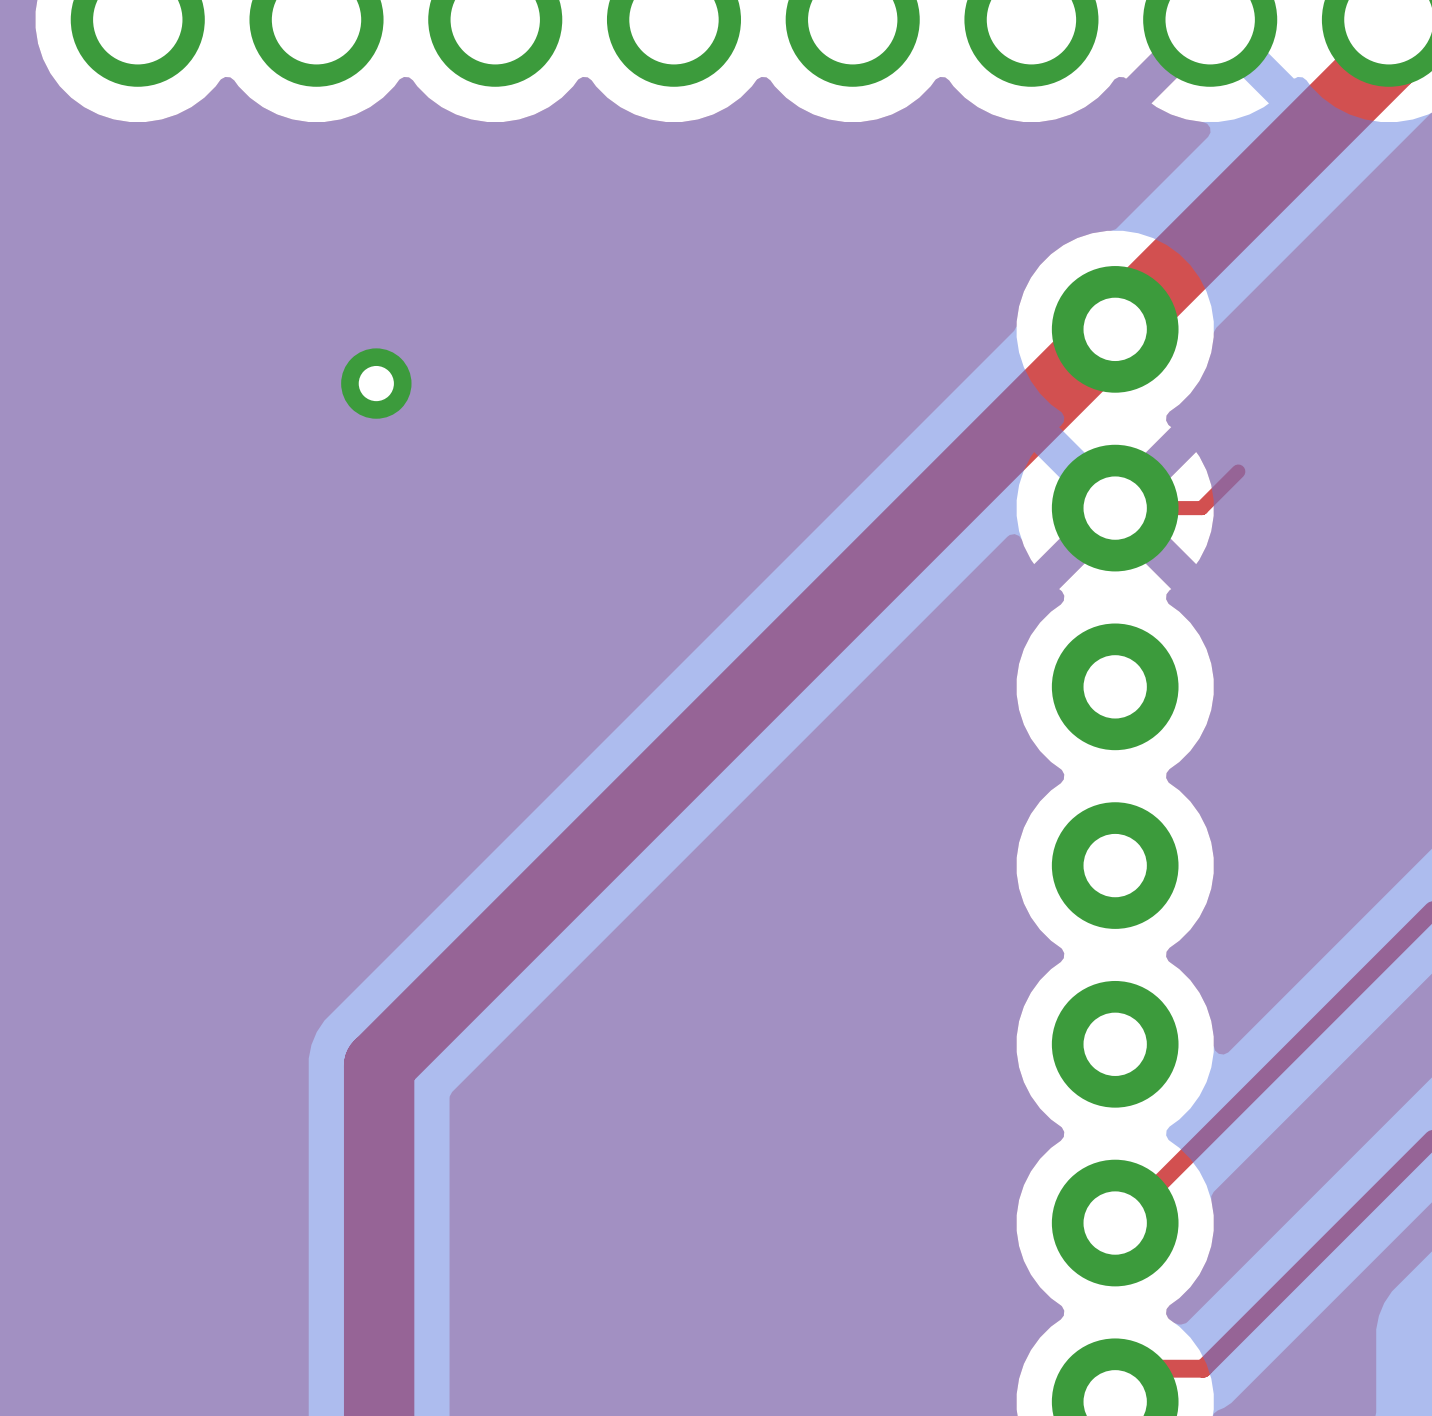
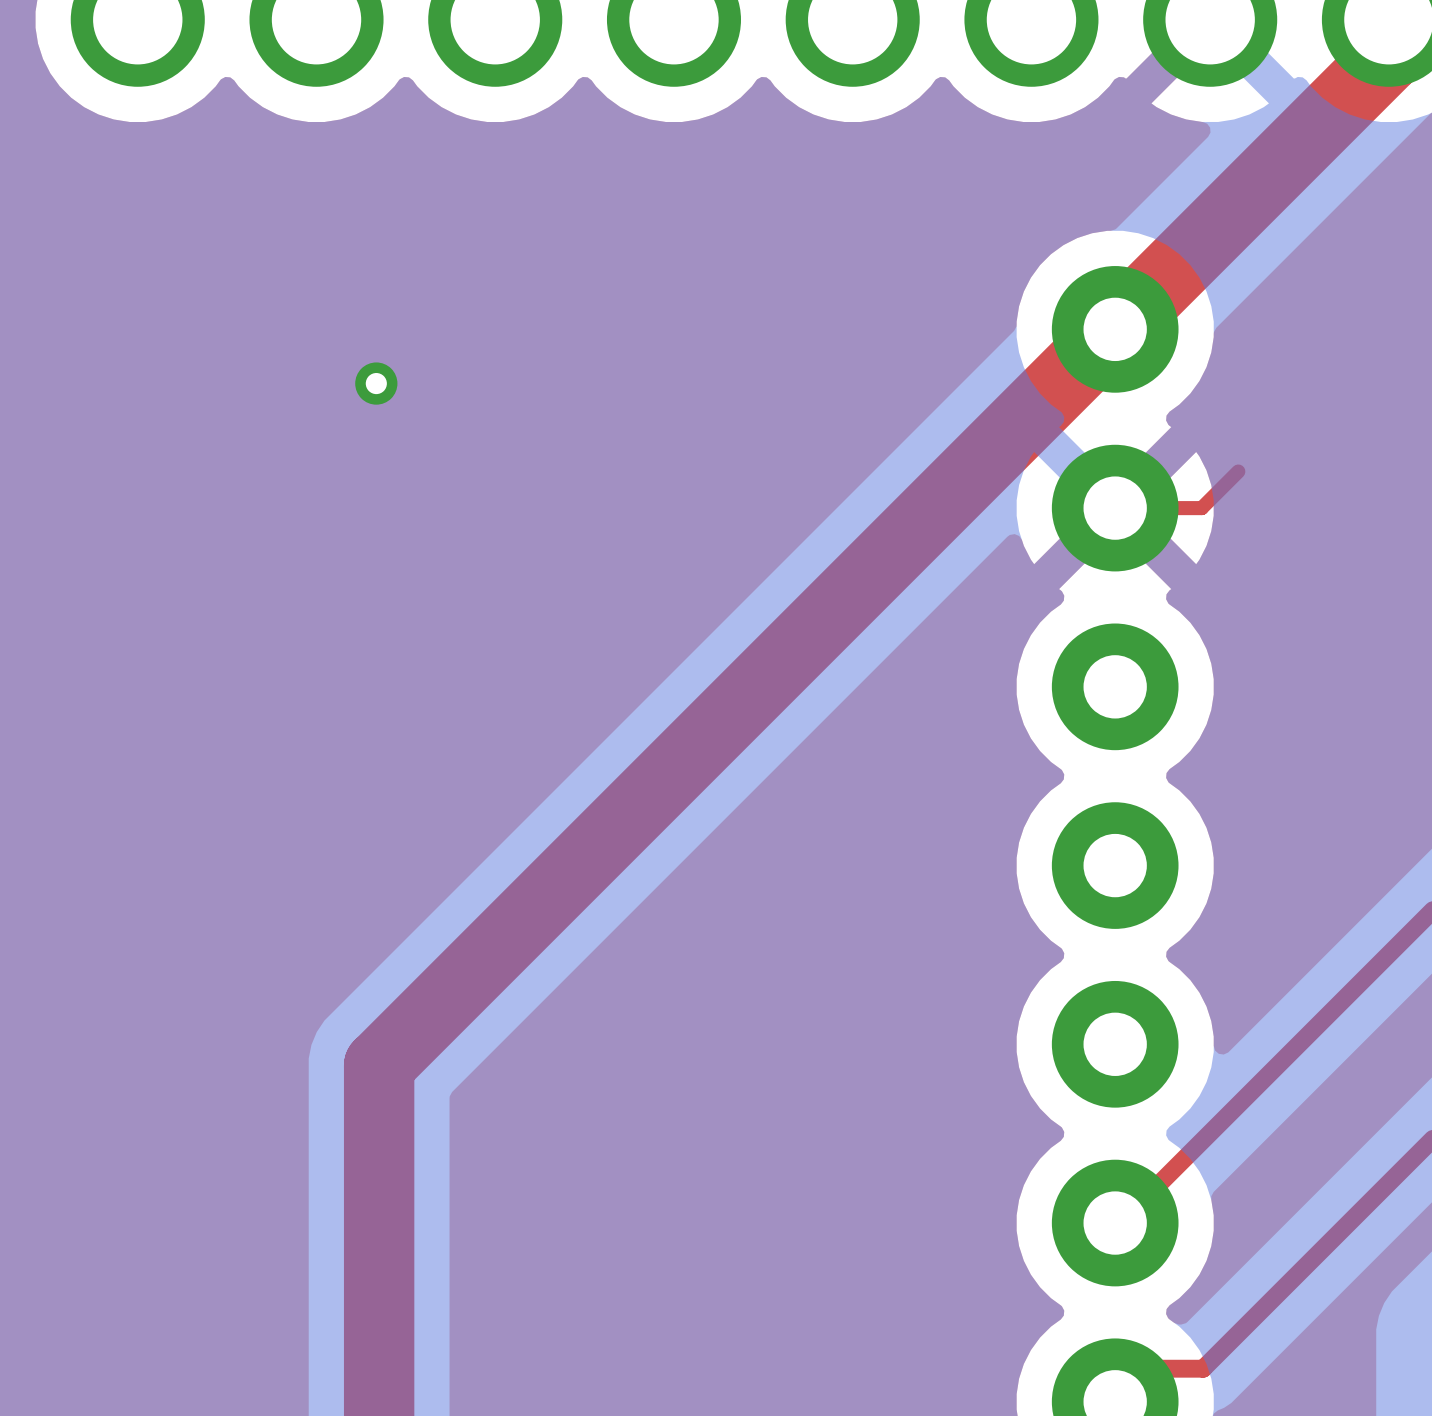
via size: [341, 348, 412, 419] -> [355, 362, 398, 405]

